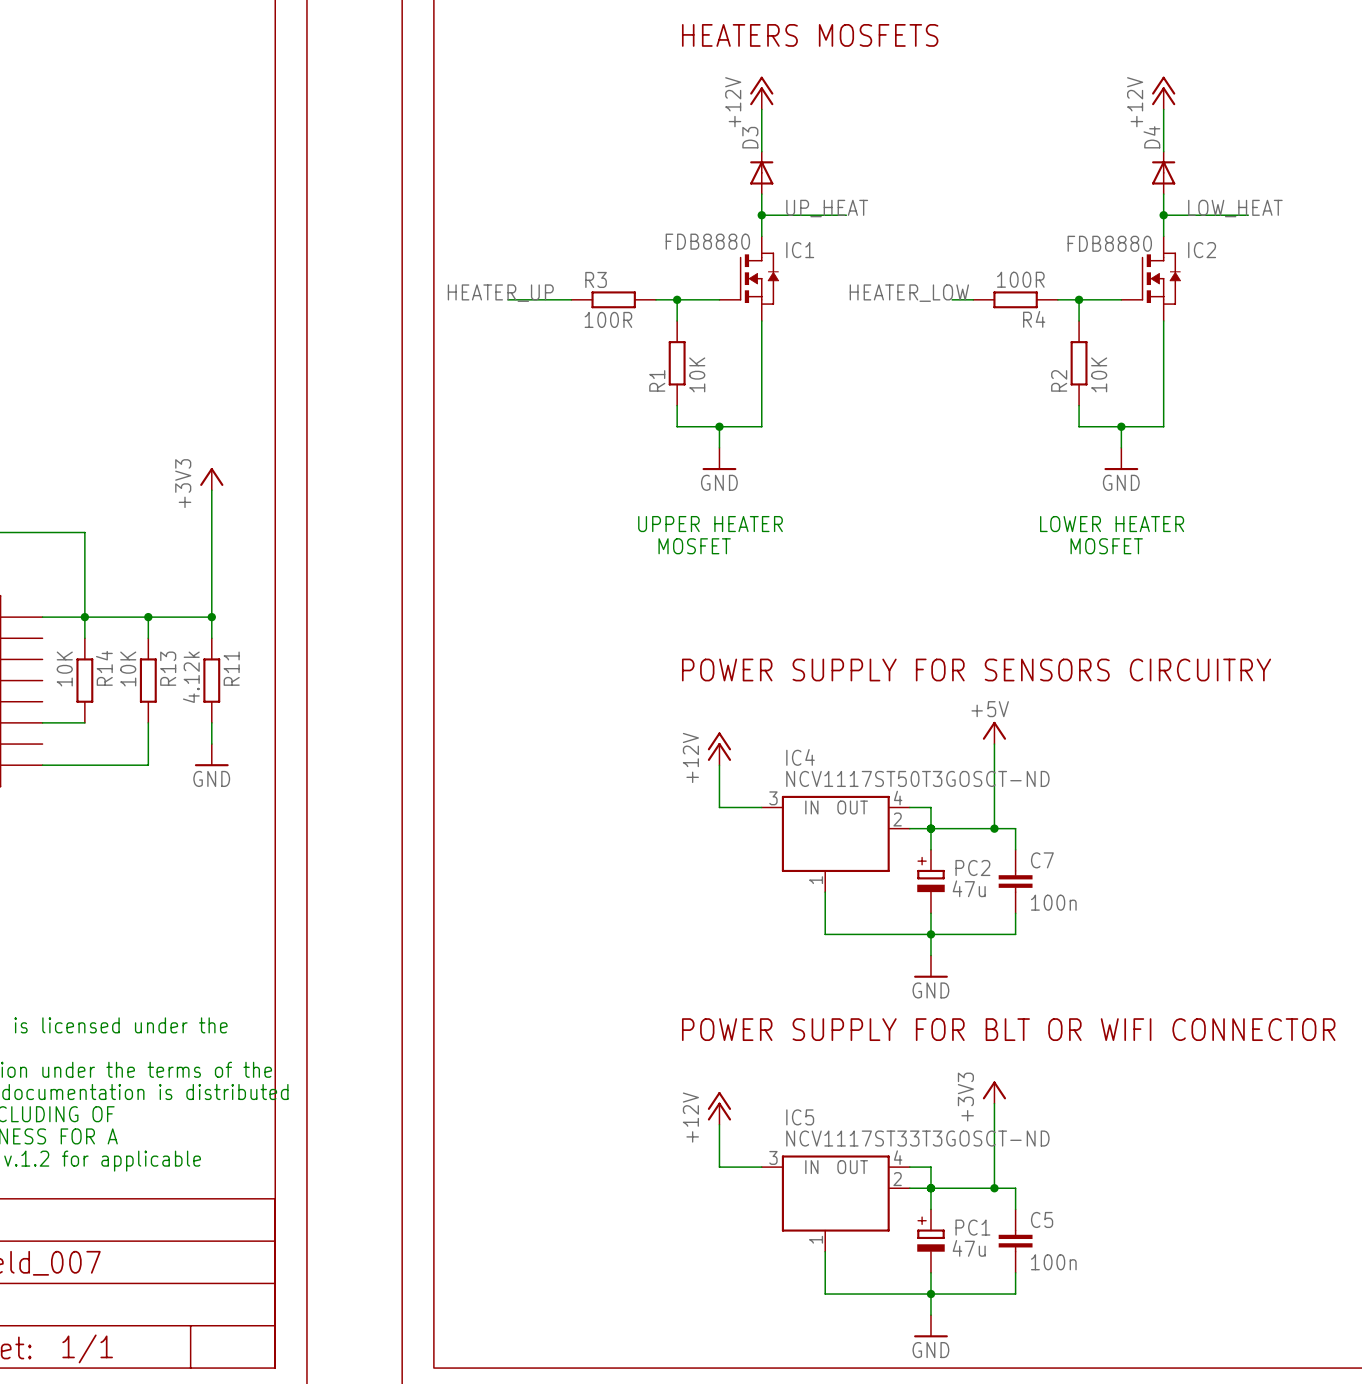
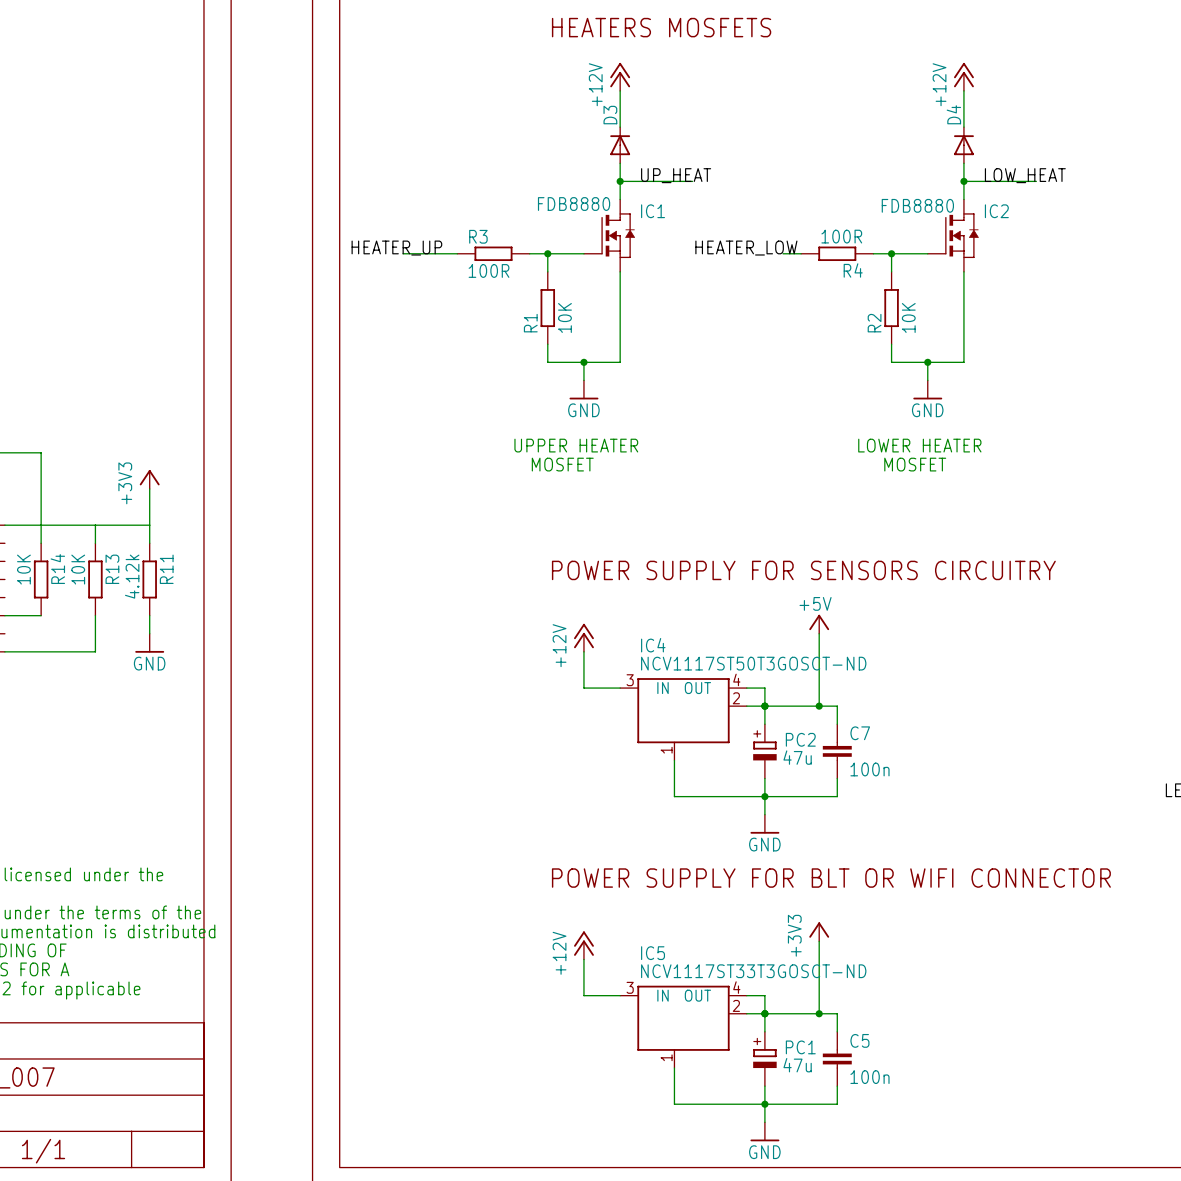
power symbol position: +3V3 (211, 479) -> +3V3 (149, 479)
wire: (211, 490) (211, 574) -> none
junction: (84, 617) -> none
junction: (148, 617) -> none
junction: (211, 617) -> none

